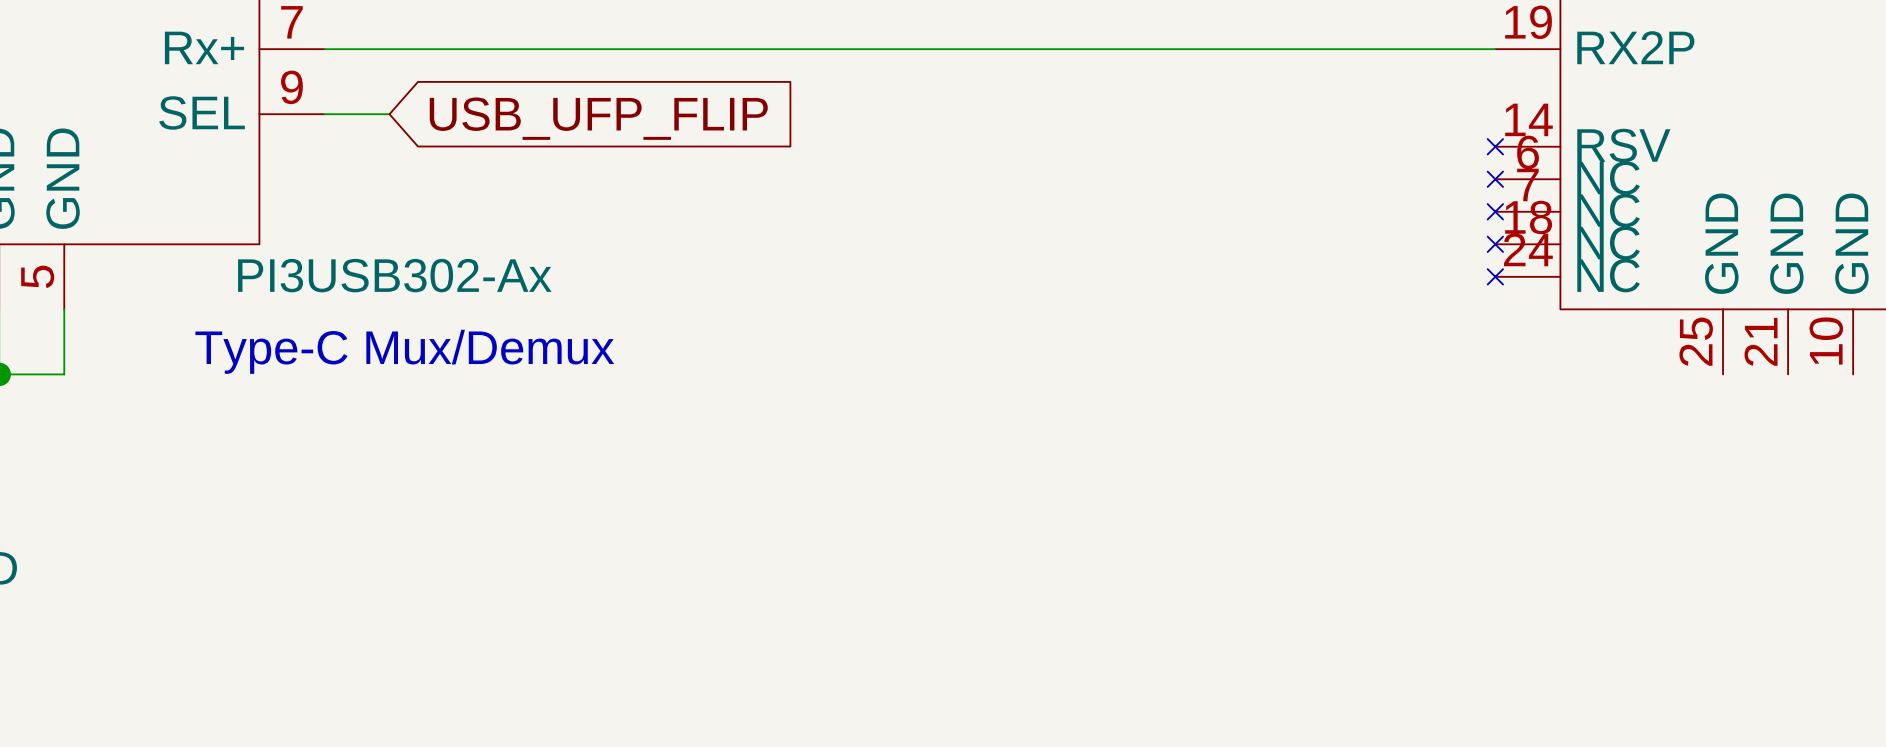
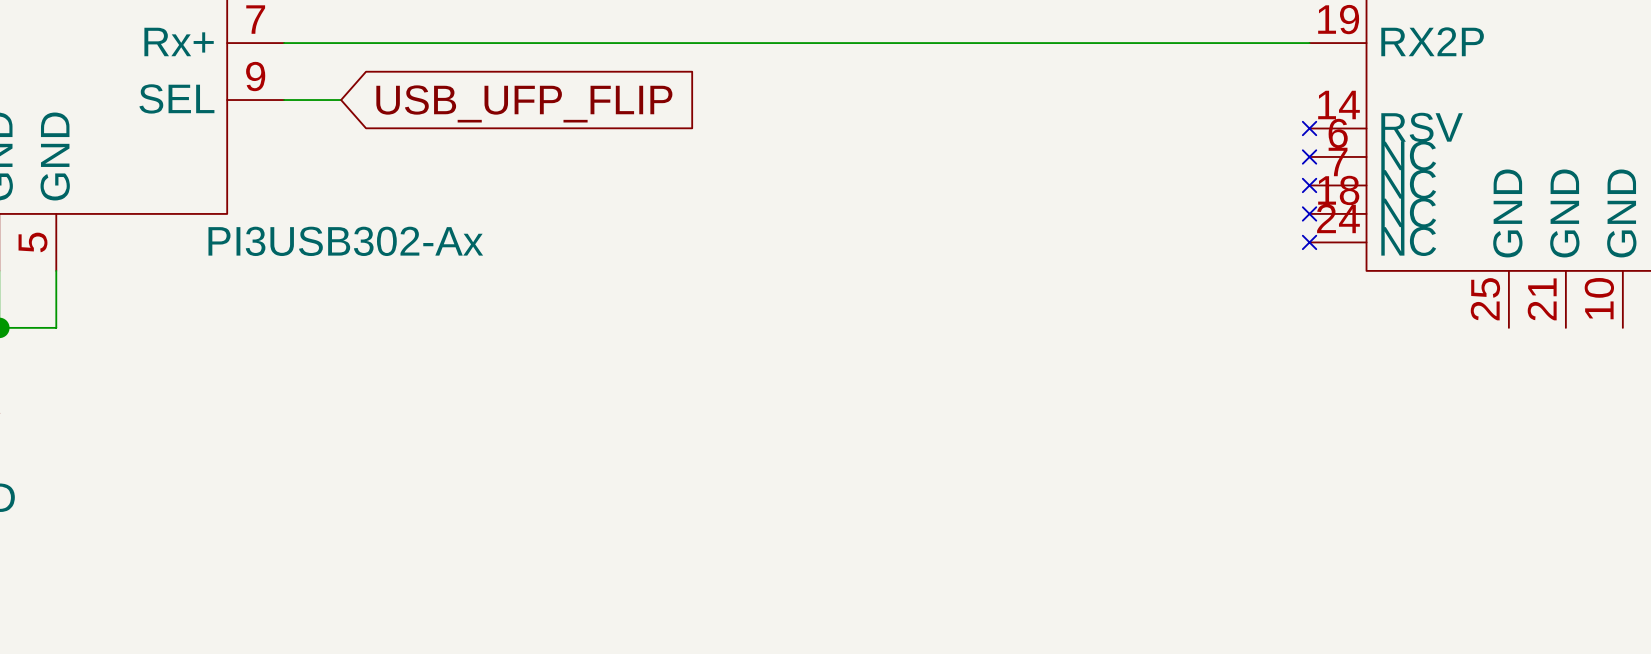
text: Type-C Mux/Demux (404, 351) -> none

